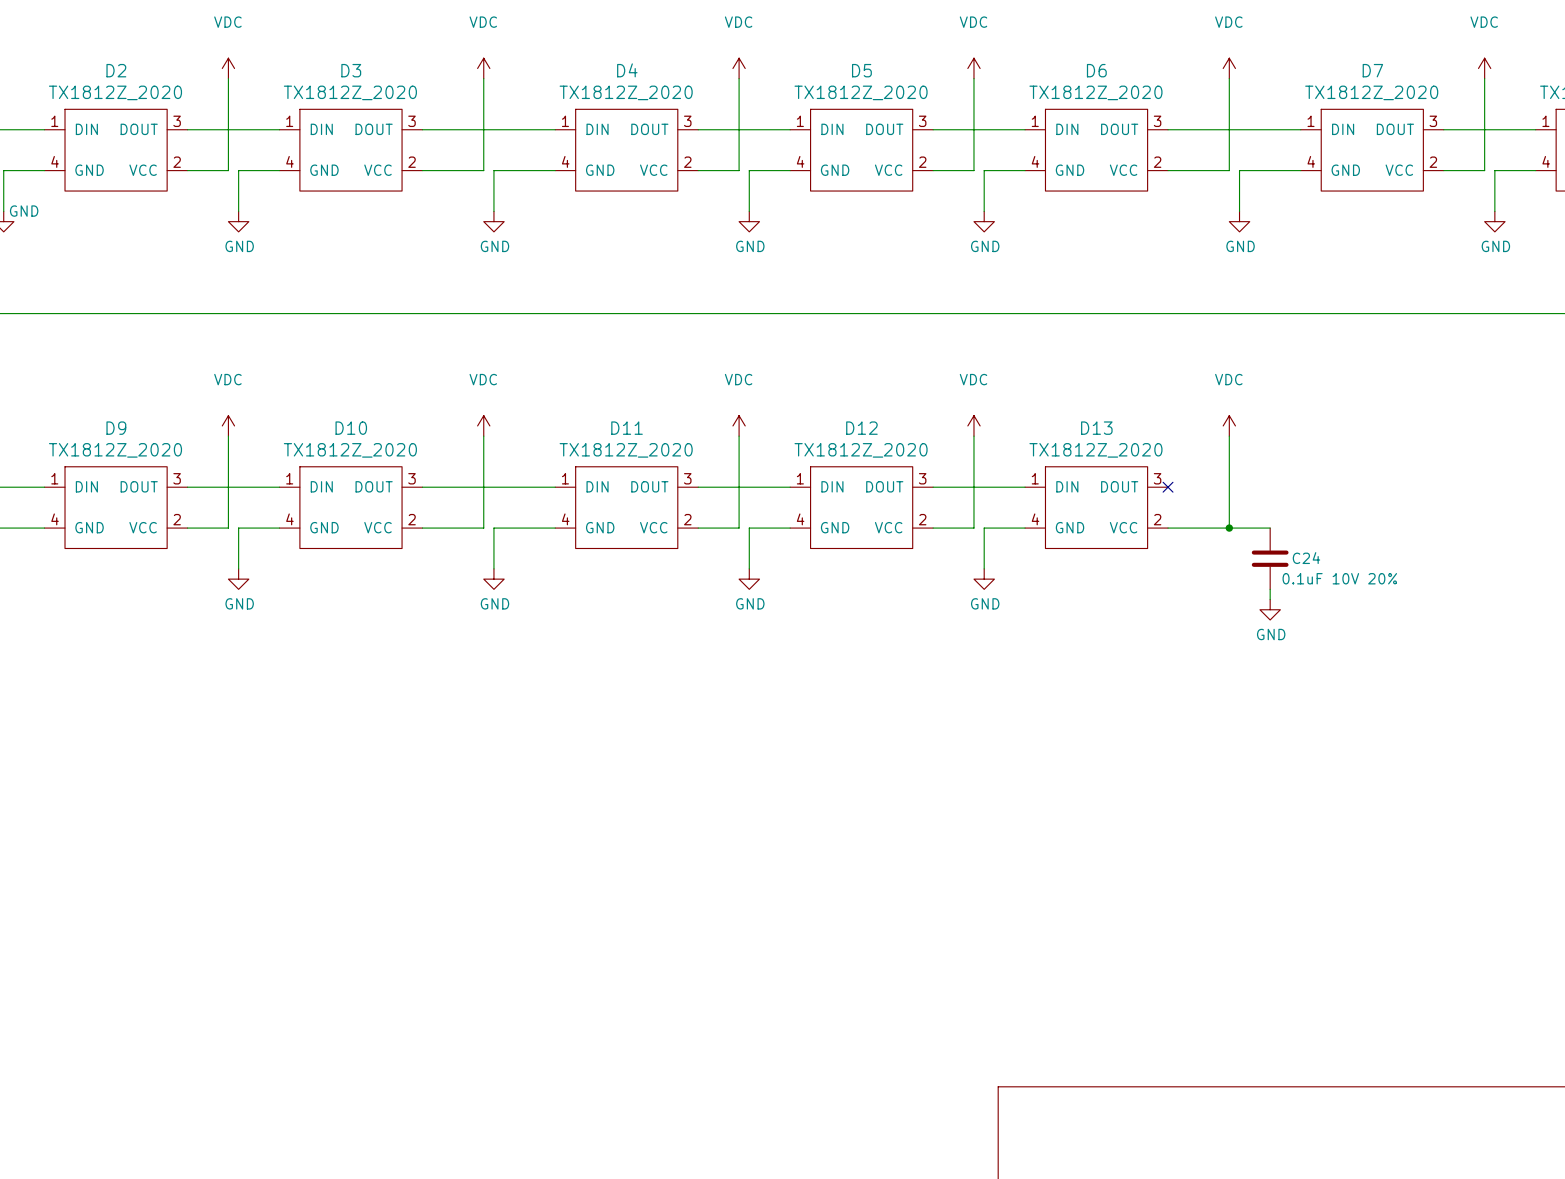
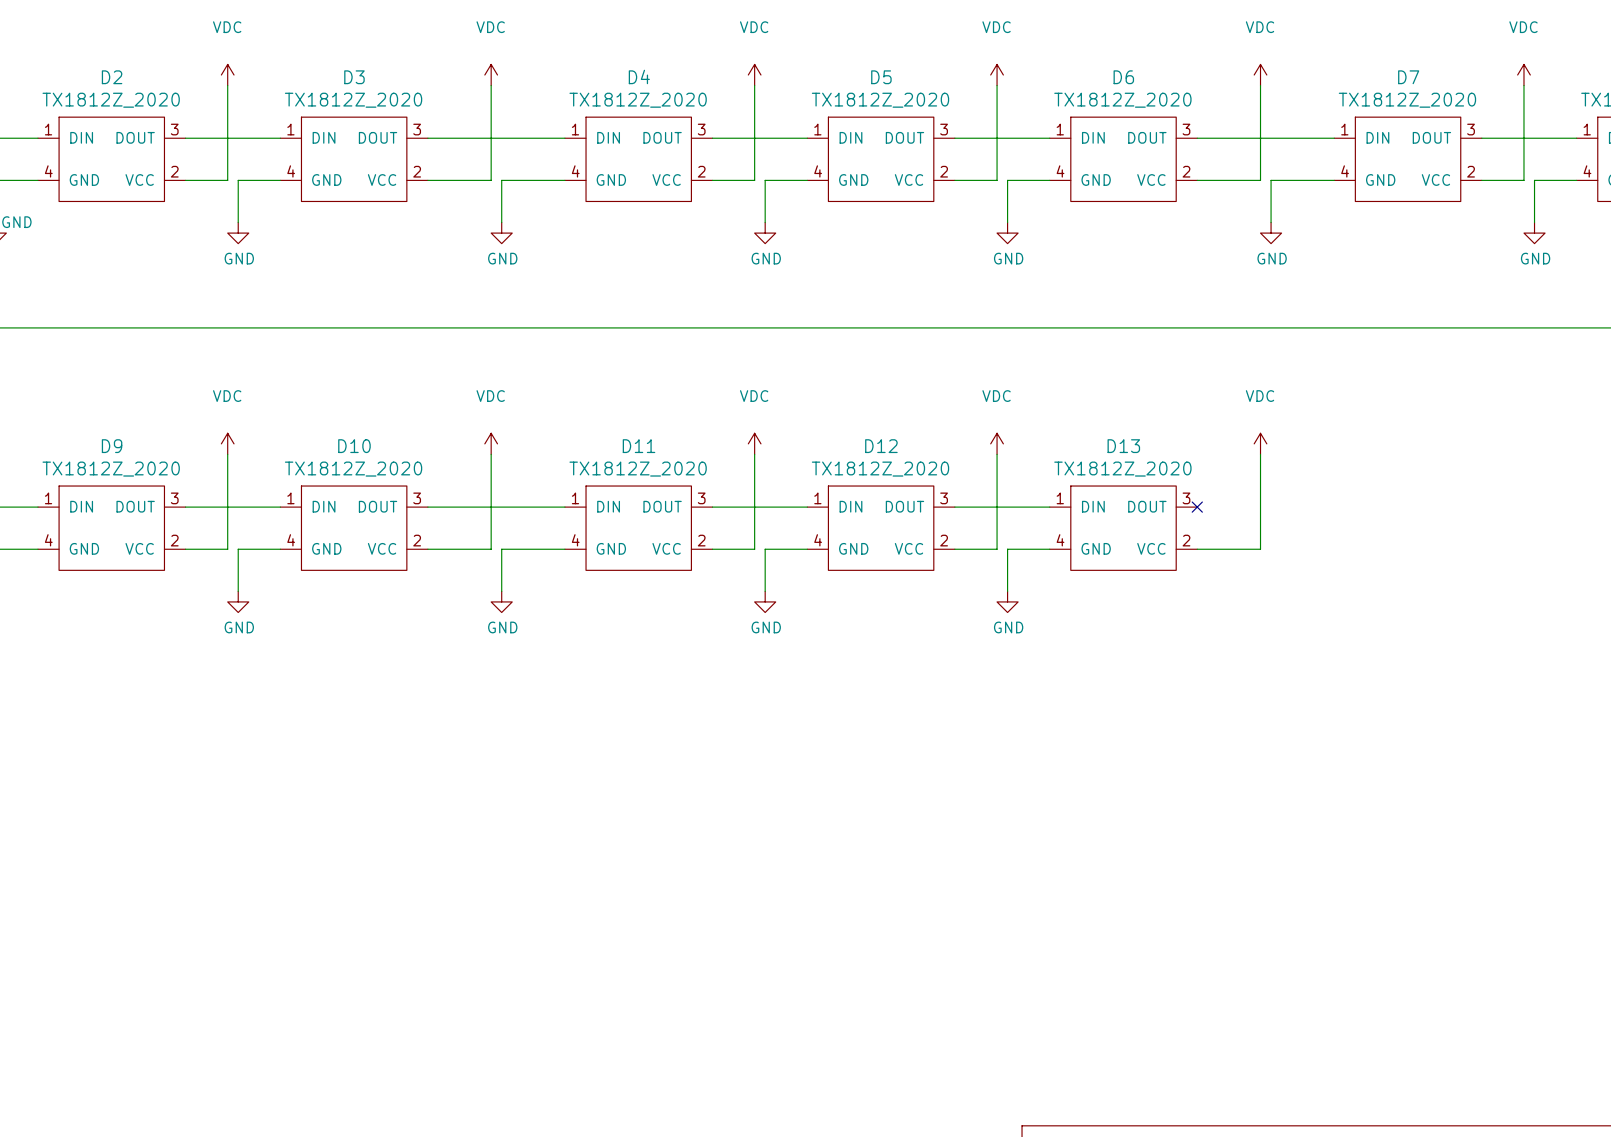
wire: (1229, 528) (1270, 528) -> none
junction: (1229, 528) -> none
C24: 0.1uF 10V 20% (1270, 558) -> none
wire: (1270, 589) (1270, 599) -> none
power symbol: GND (1270, 609) -> none

